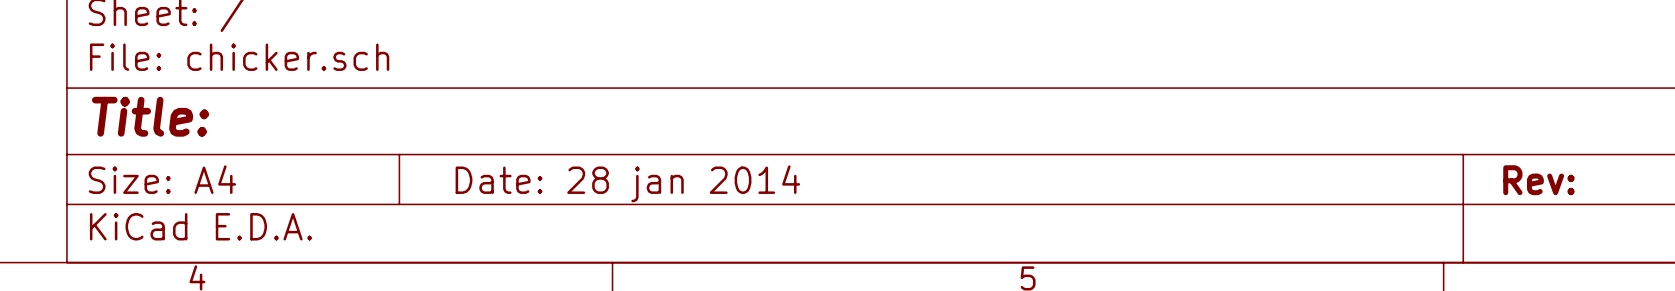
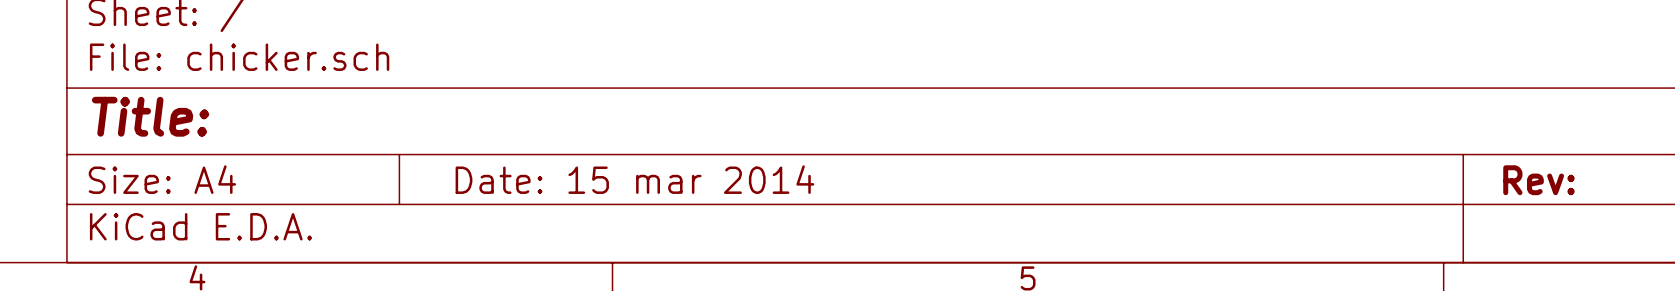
title block: Date: 28 jan 2014 (627, 183) -> Date: 15 mar 2014 (634, 179)

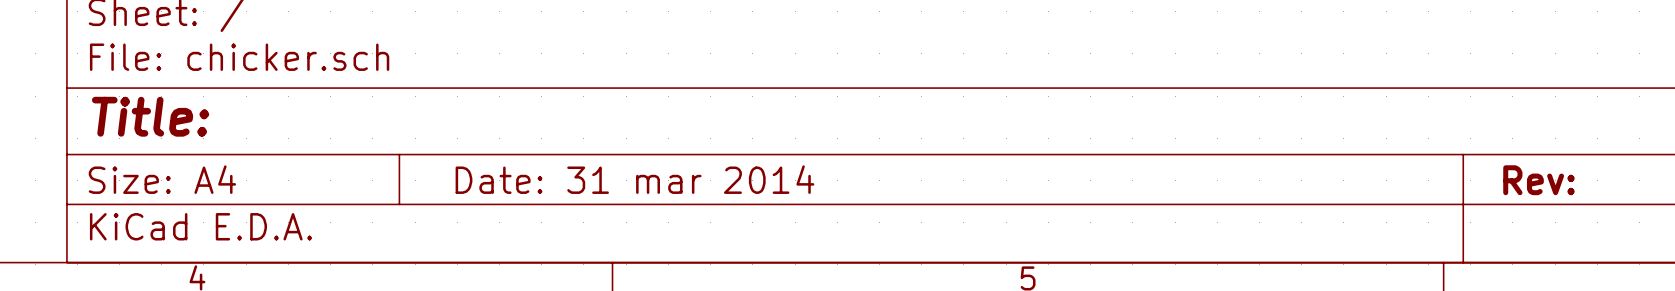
title block: Date: 15 mar 2014 (634, 179) -> Date: 31 mar 2014 (634, 179)

